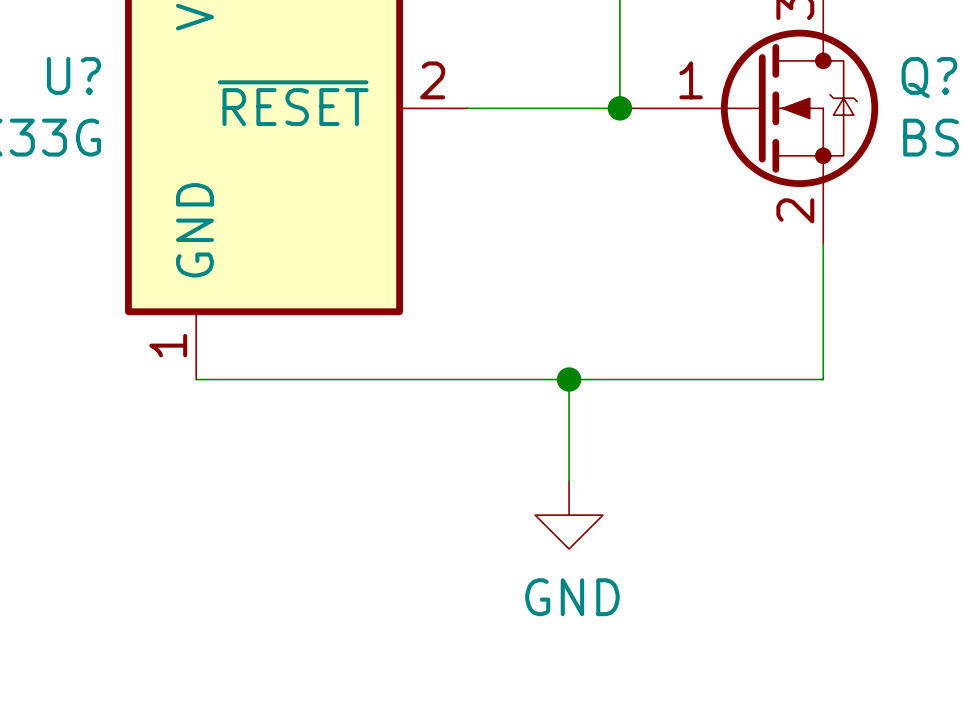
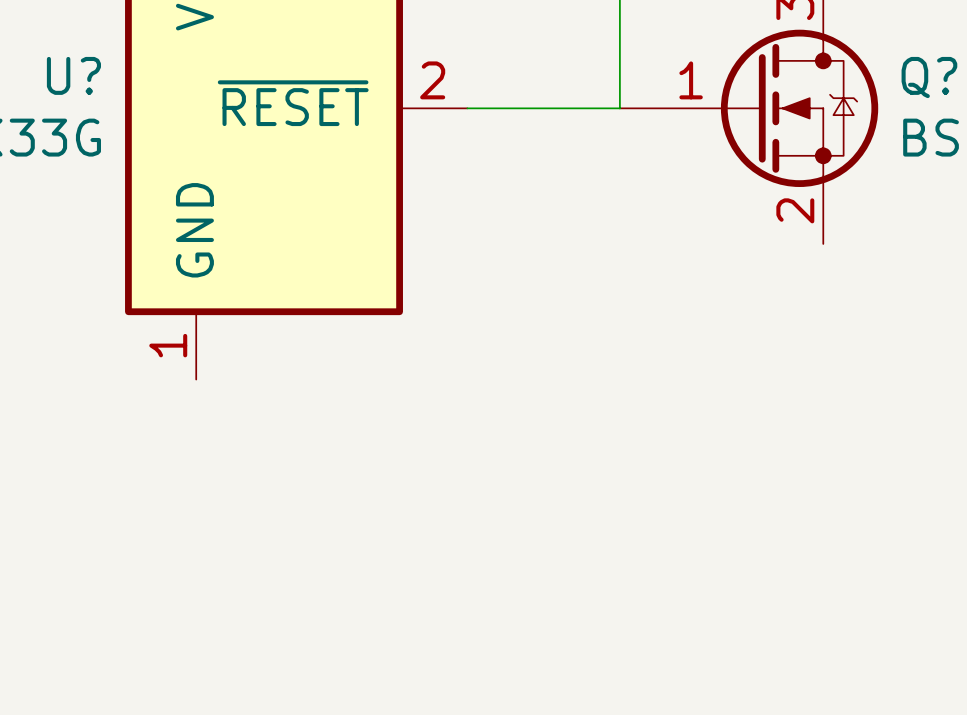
junction: (619, 108) -> none
wire: (823, 243) (823, 379) (196, 379) -> none
wire: (569, 379) (569, 481) -> none
junction: (569, 379) -> none
power symbol: GND (569, 515) -> none

